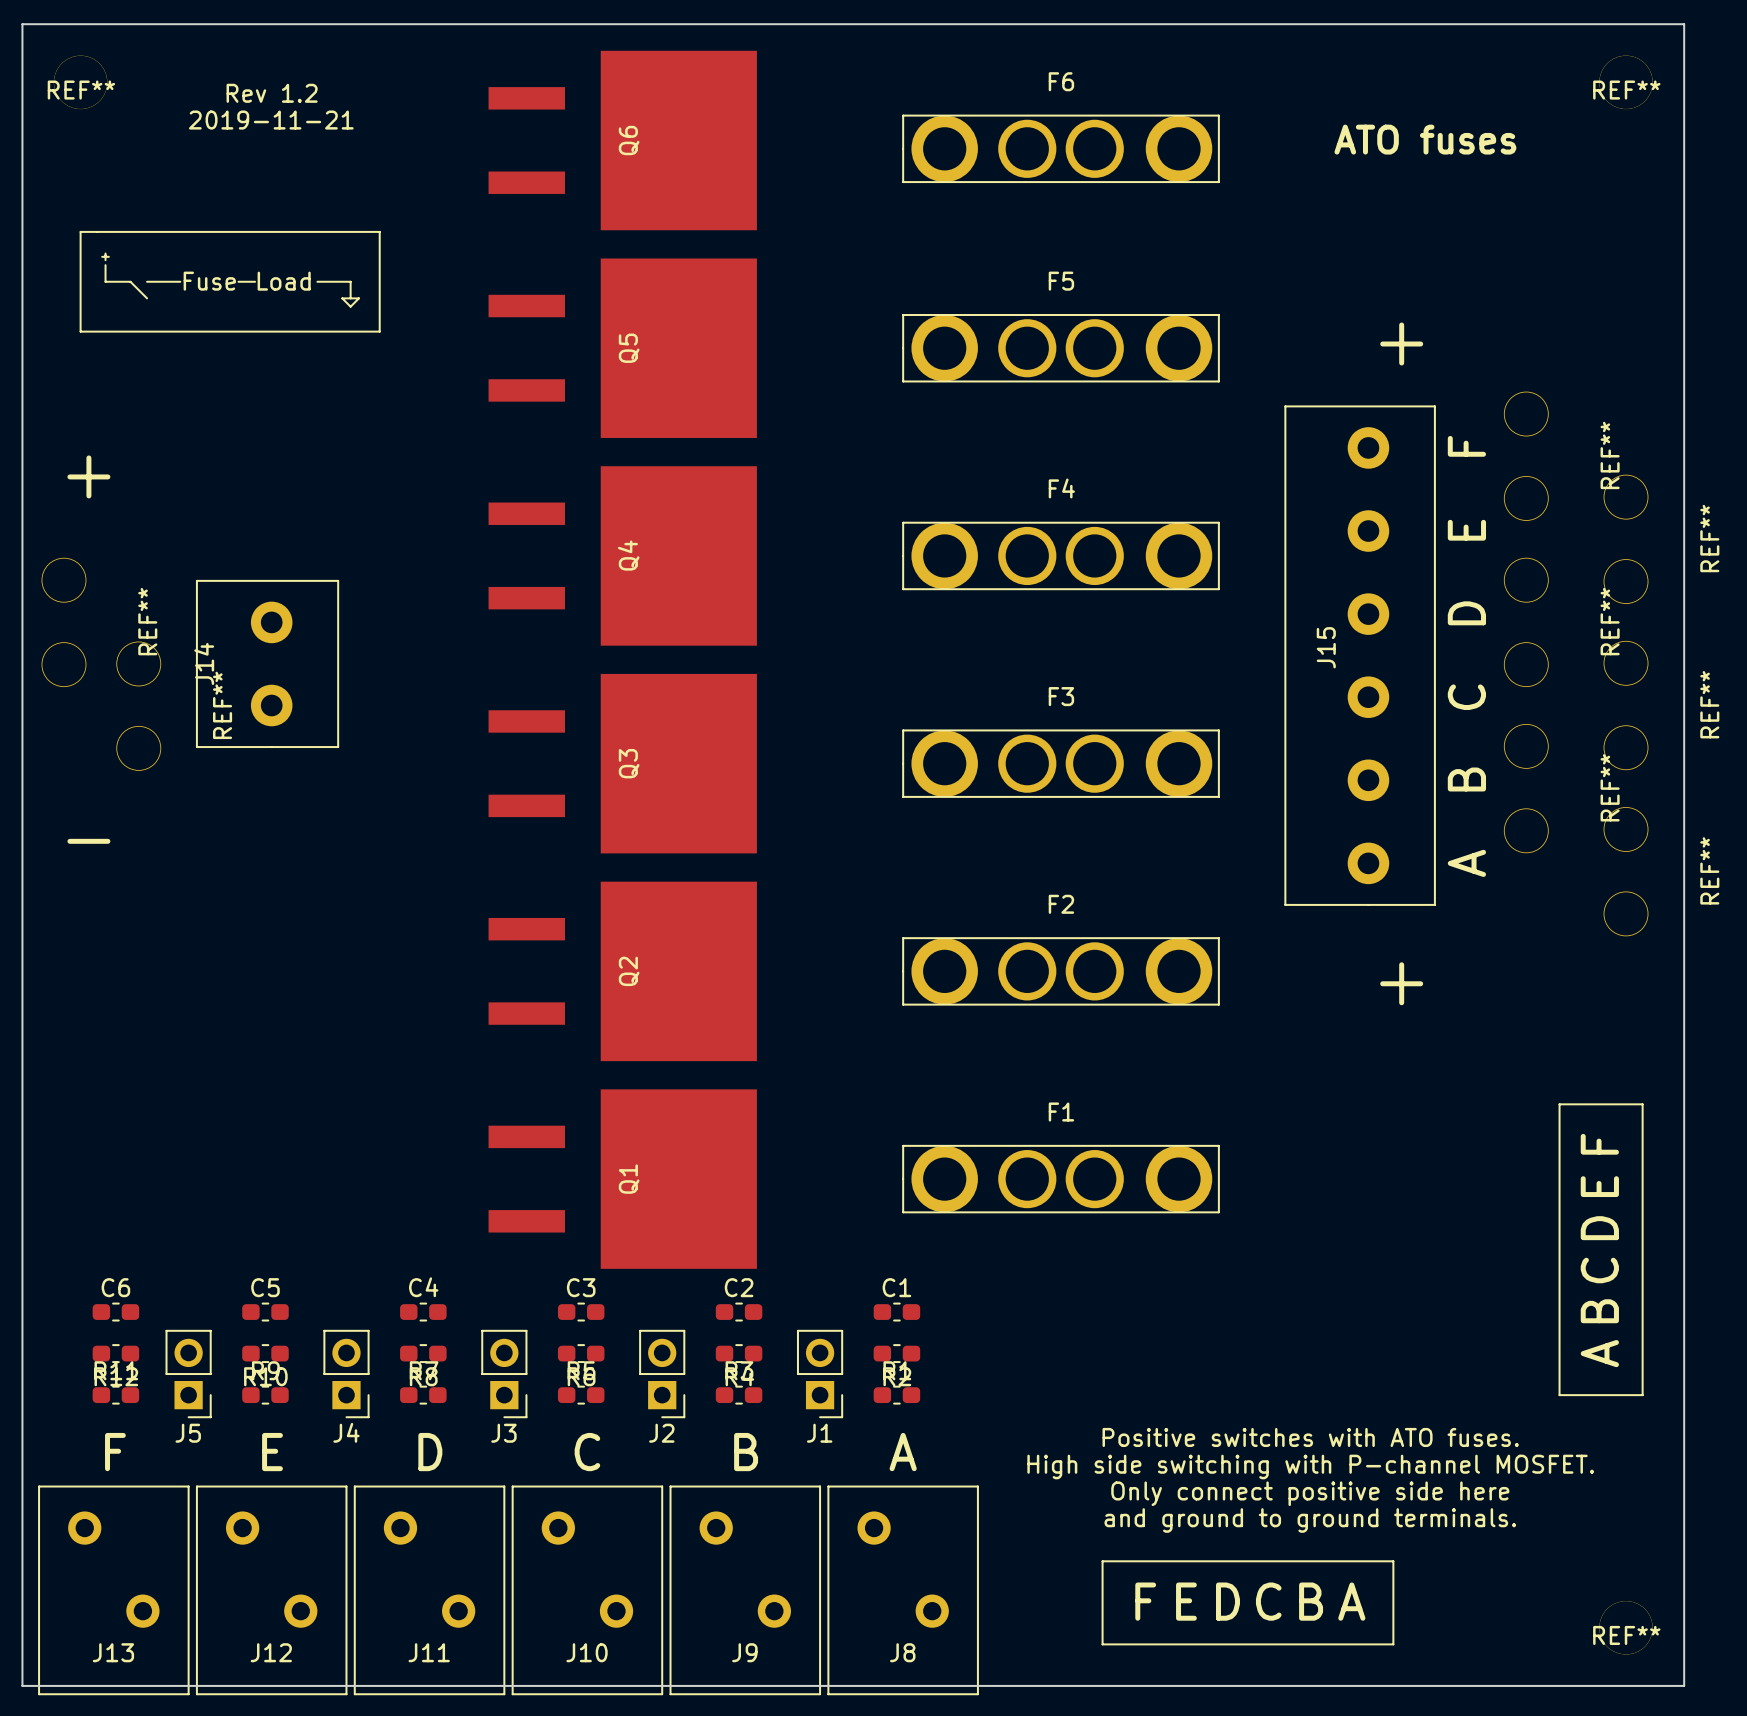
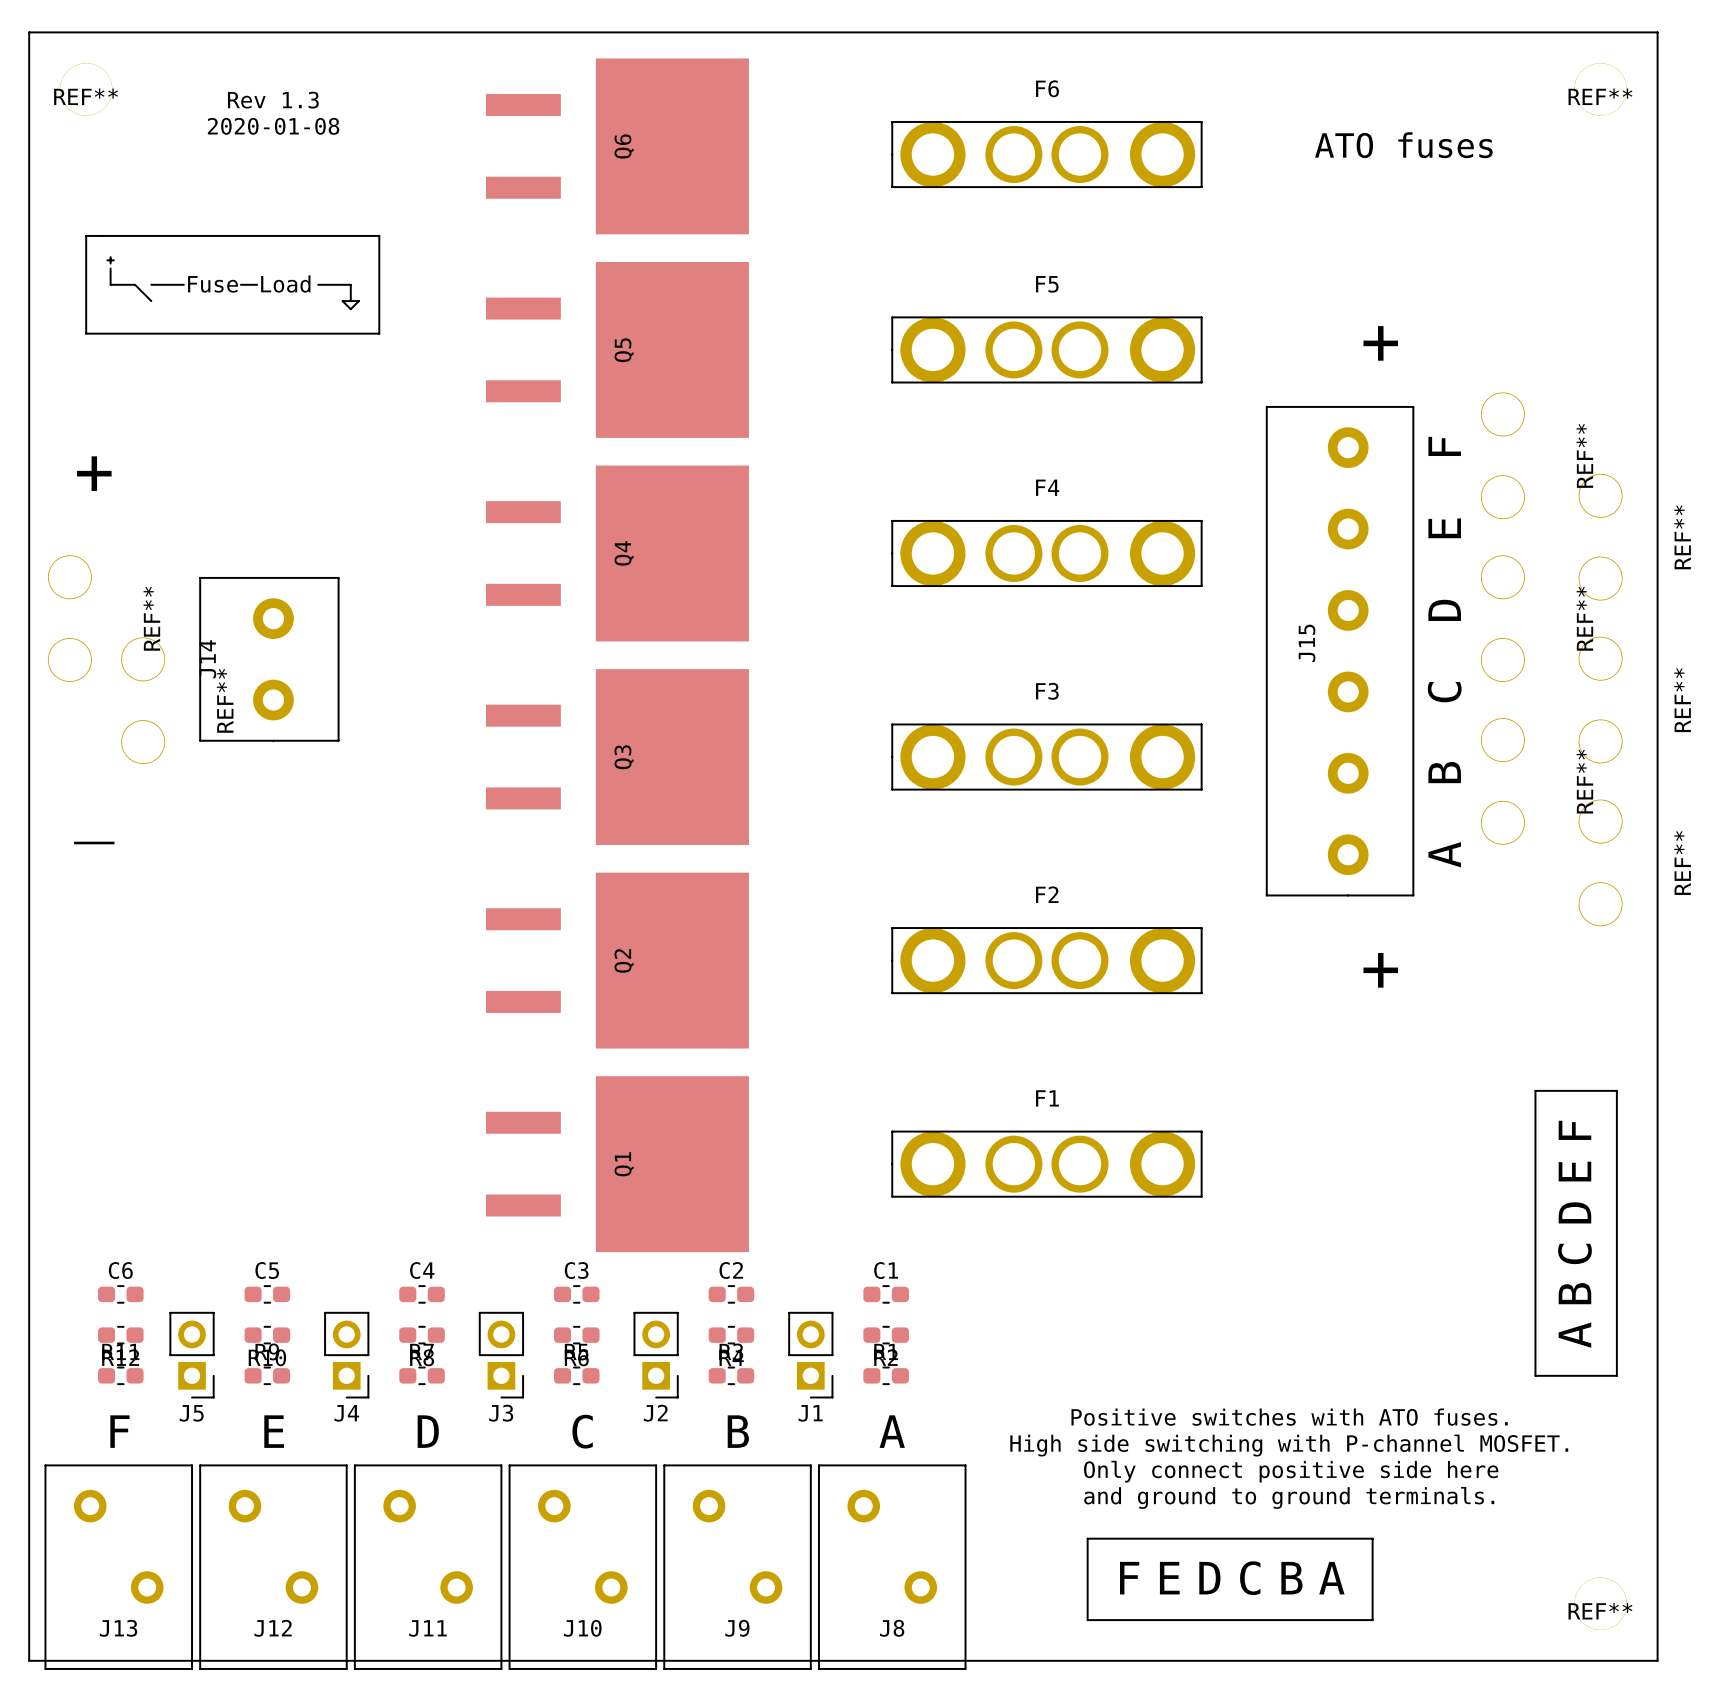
text: Rev 1.2 (272, 93) -> Rev 1.3 (273, 100)
text: 2019-11-21 (271, 120) -> 2020-01-08 (273, 126)

